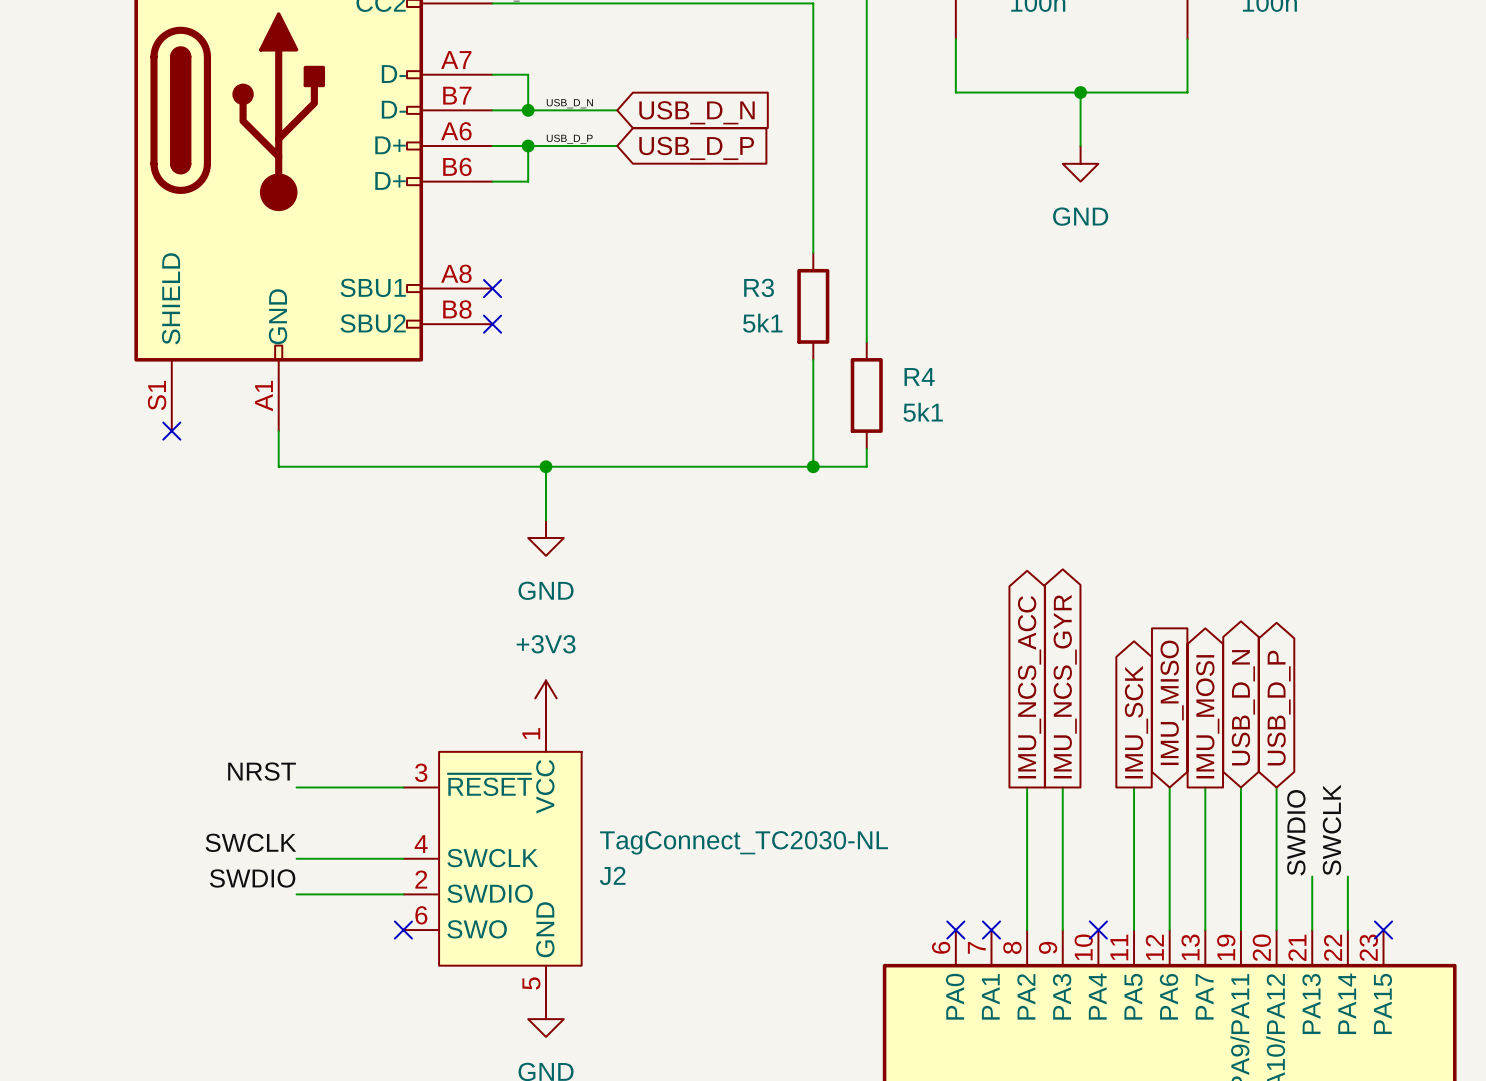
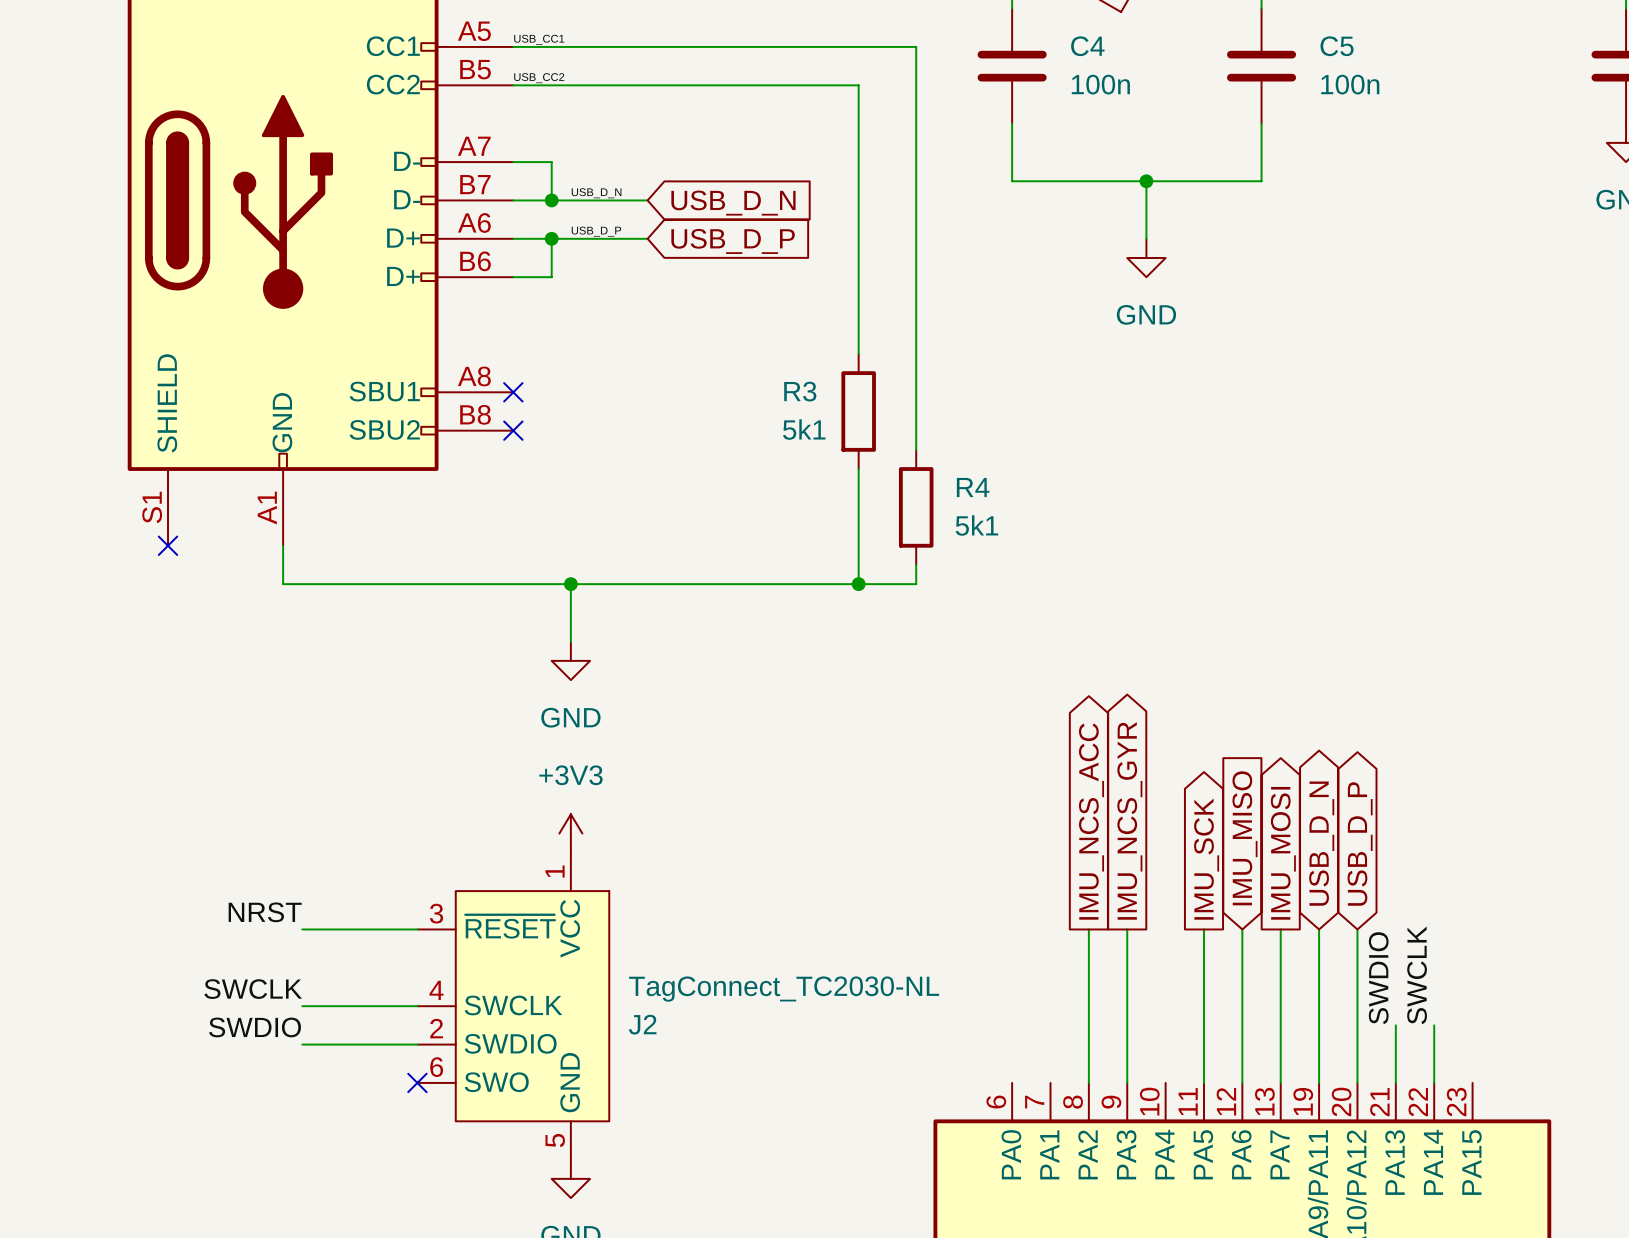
no-connect mark: (955, 930) -> none
no-connect mark: (991, 930) -> none
no-connect mark: (1098, 930) -> none
no-connect mark: (1383, 930) -> none

